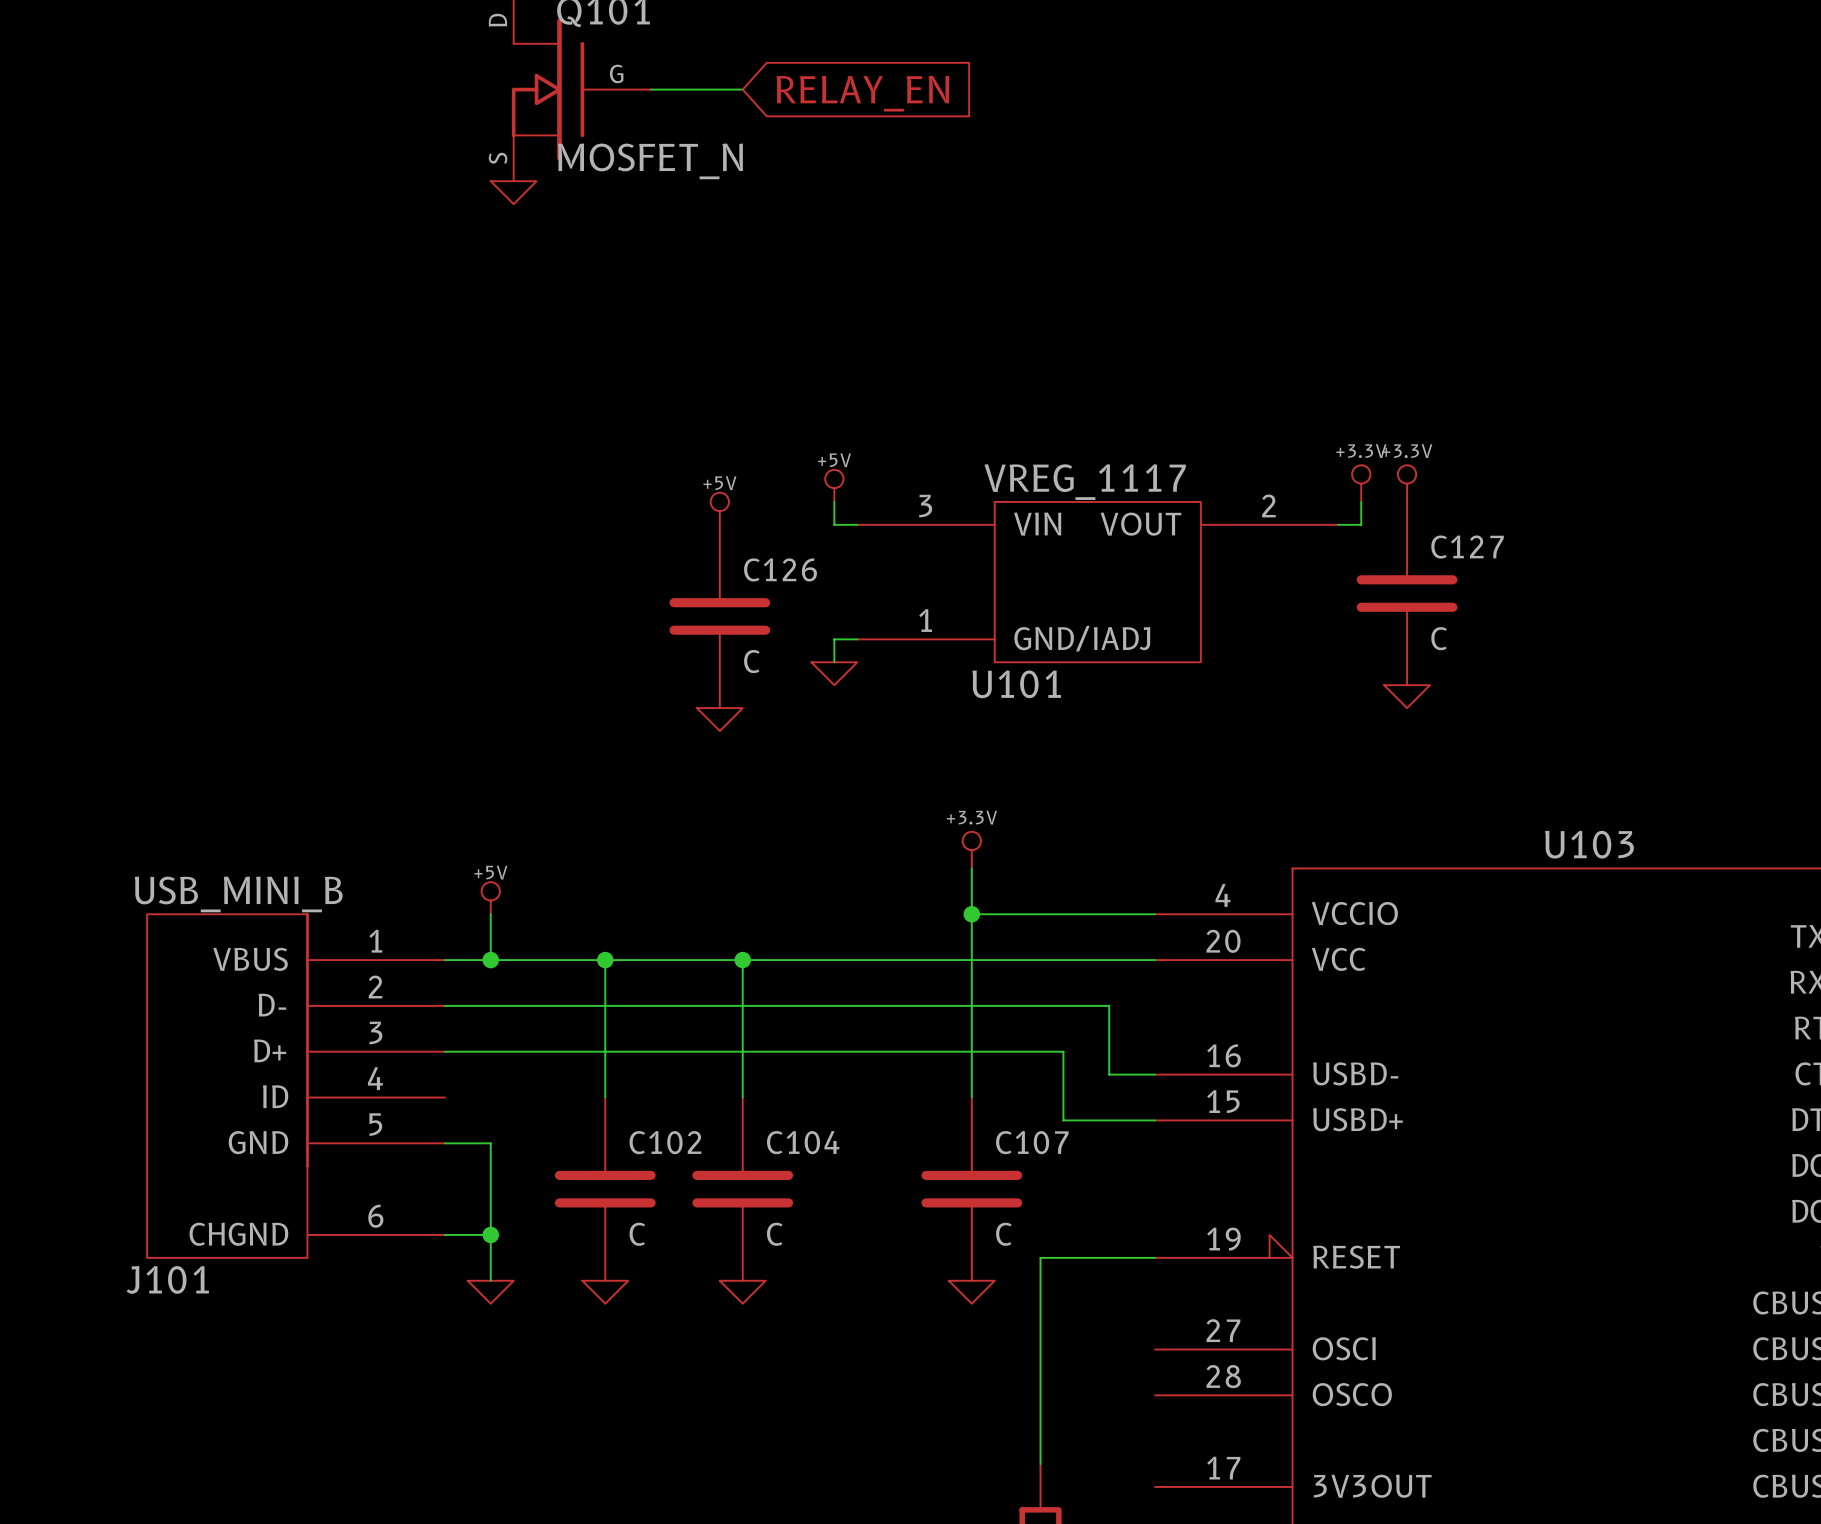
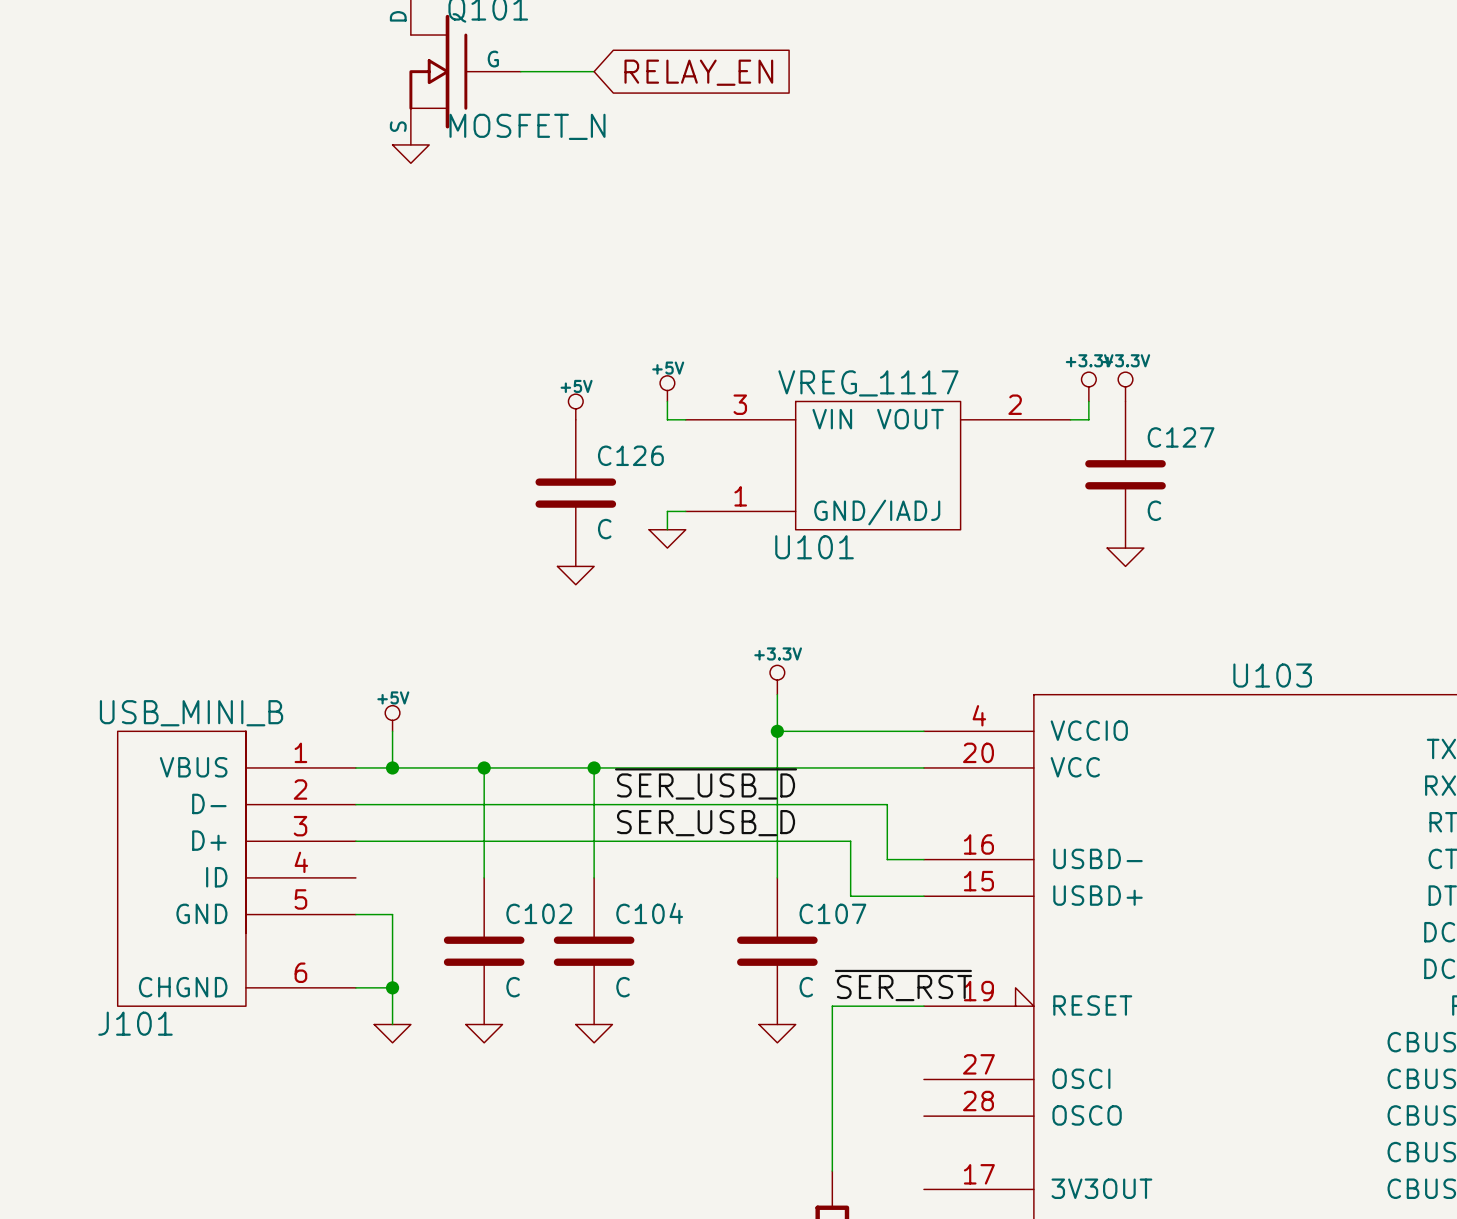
label: none -> ~{SER_USB_D} (706, 783)
label: none -> SER_USB_D (706, 823)
label: none -> ~{SER_RST} (903, 985)

